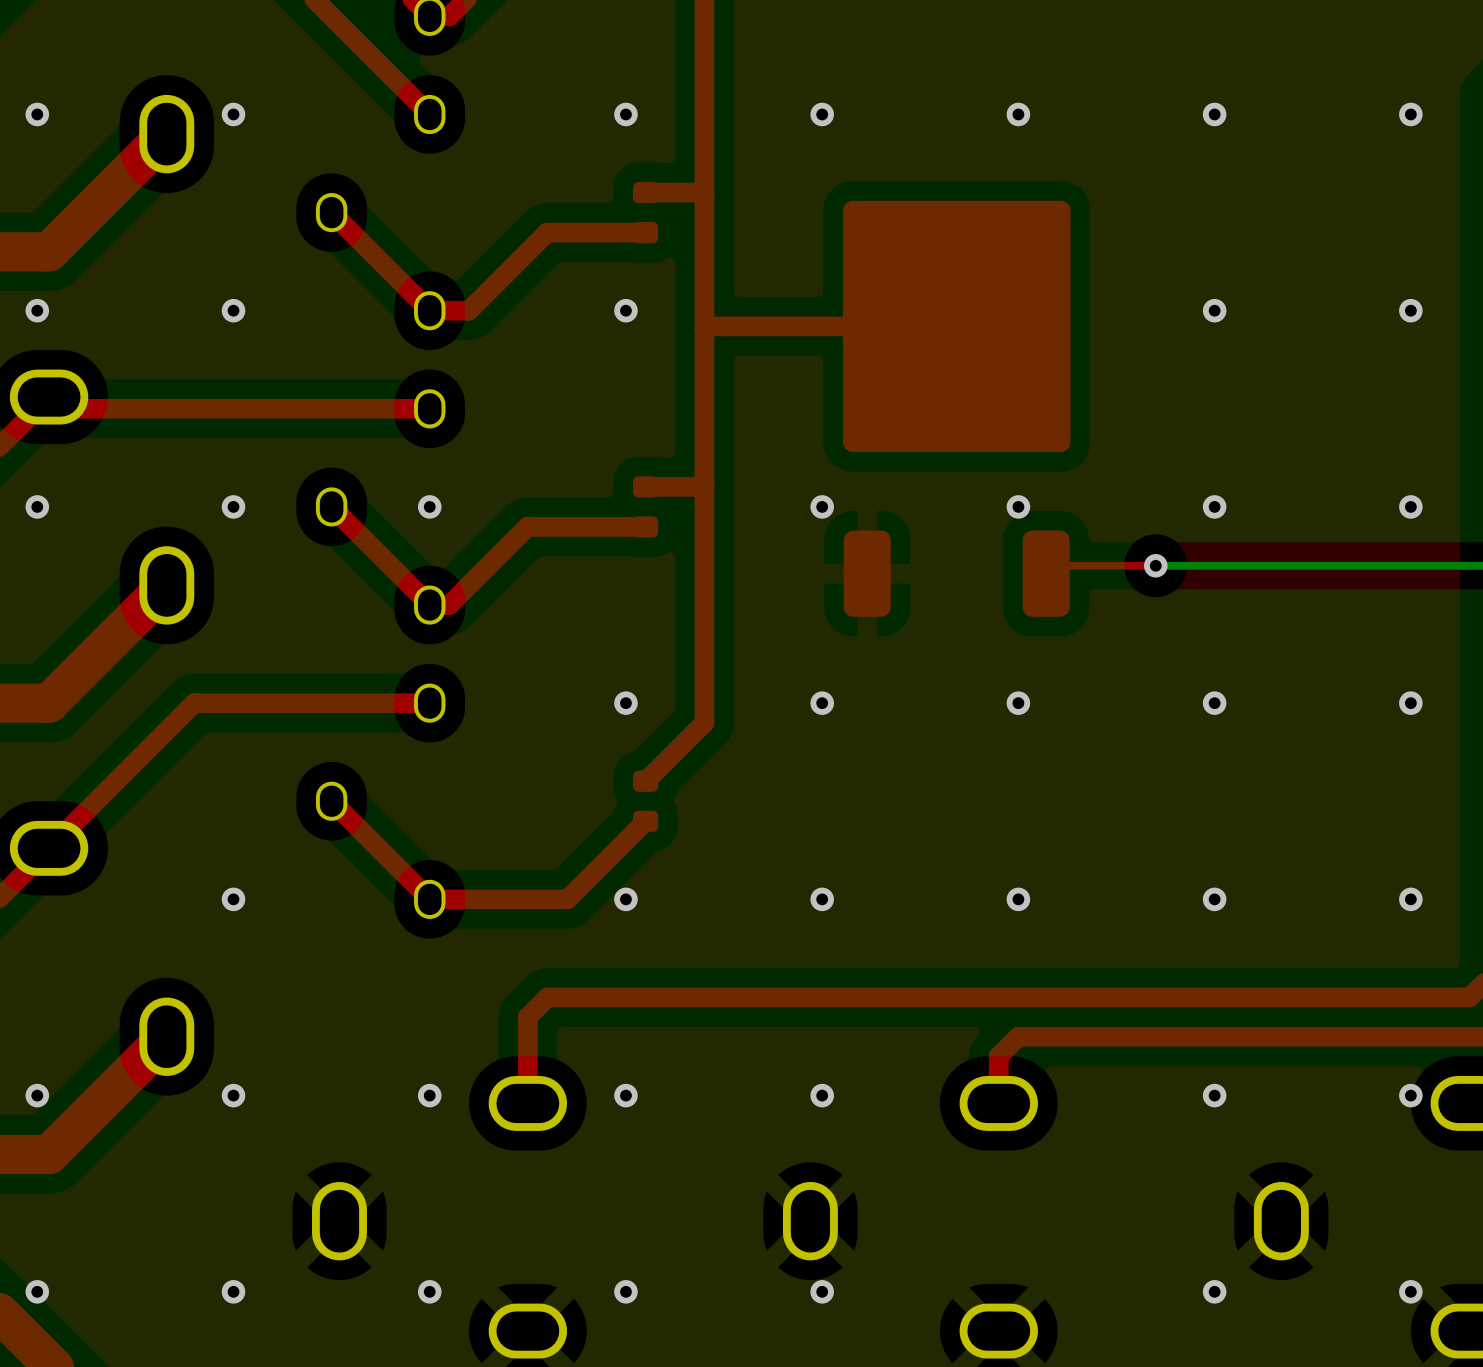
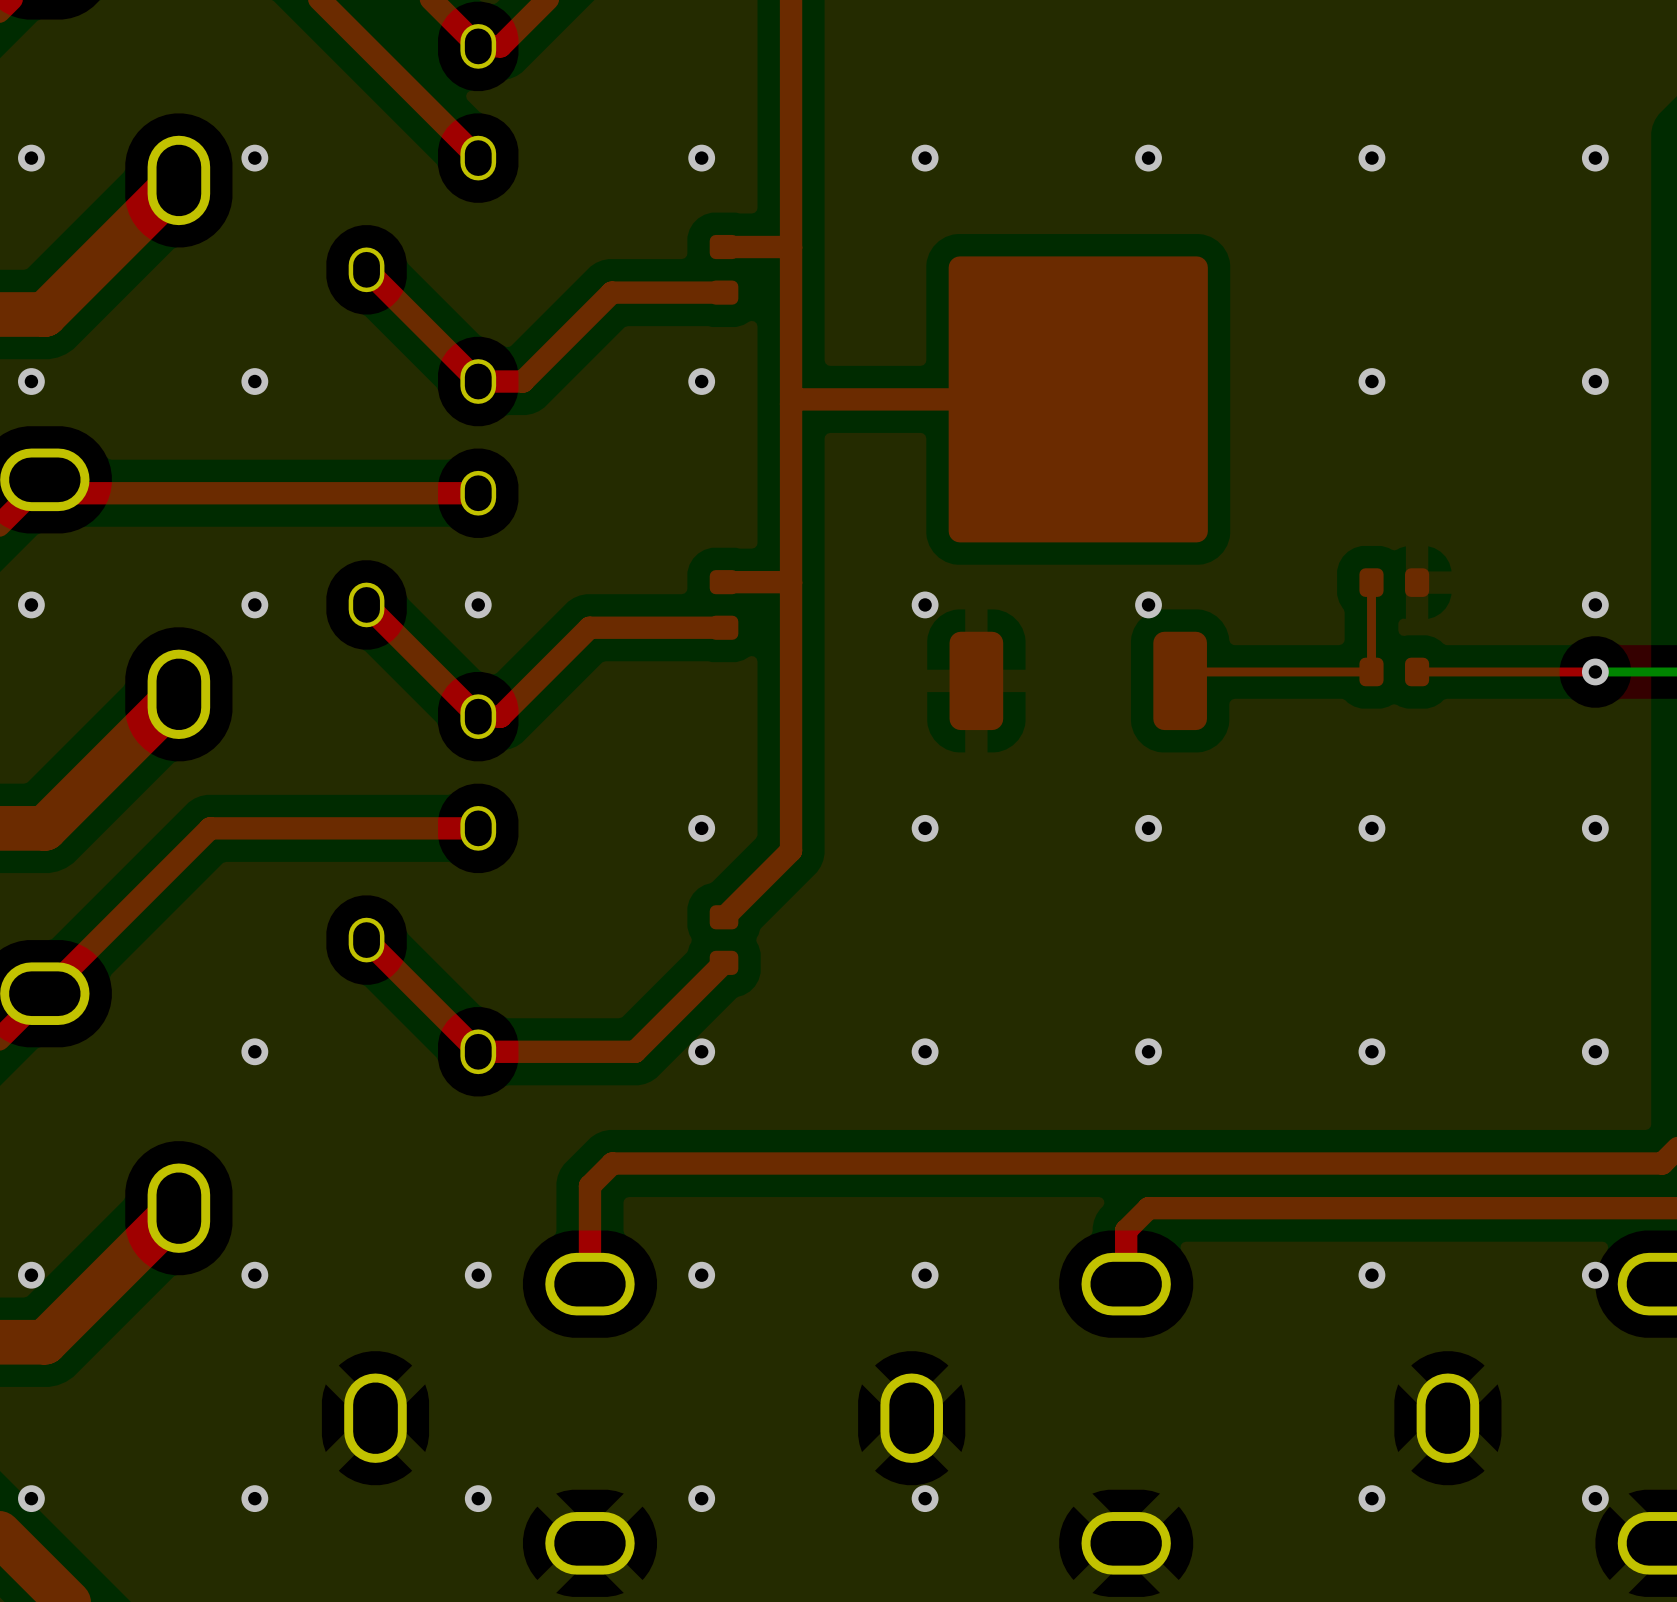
top track: none -> (1371, 582) (1371, 671) (1304, 671)
part: none -> (1394, 582)
via: (1214, 506) -> none
via: (1155, 565) -> none
part: none -> (1394, 671)
top track: none -> (1595, 671) (1417, 671)
bottom track: (1410, 565) (1155, 565) -> none
via: none -> (1595, 671)

